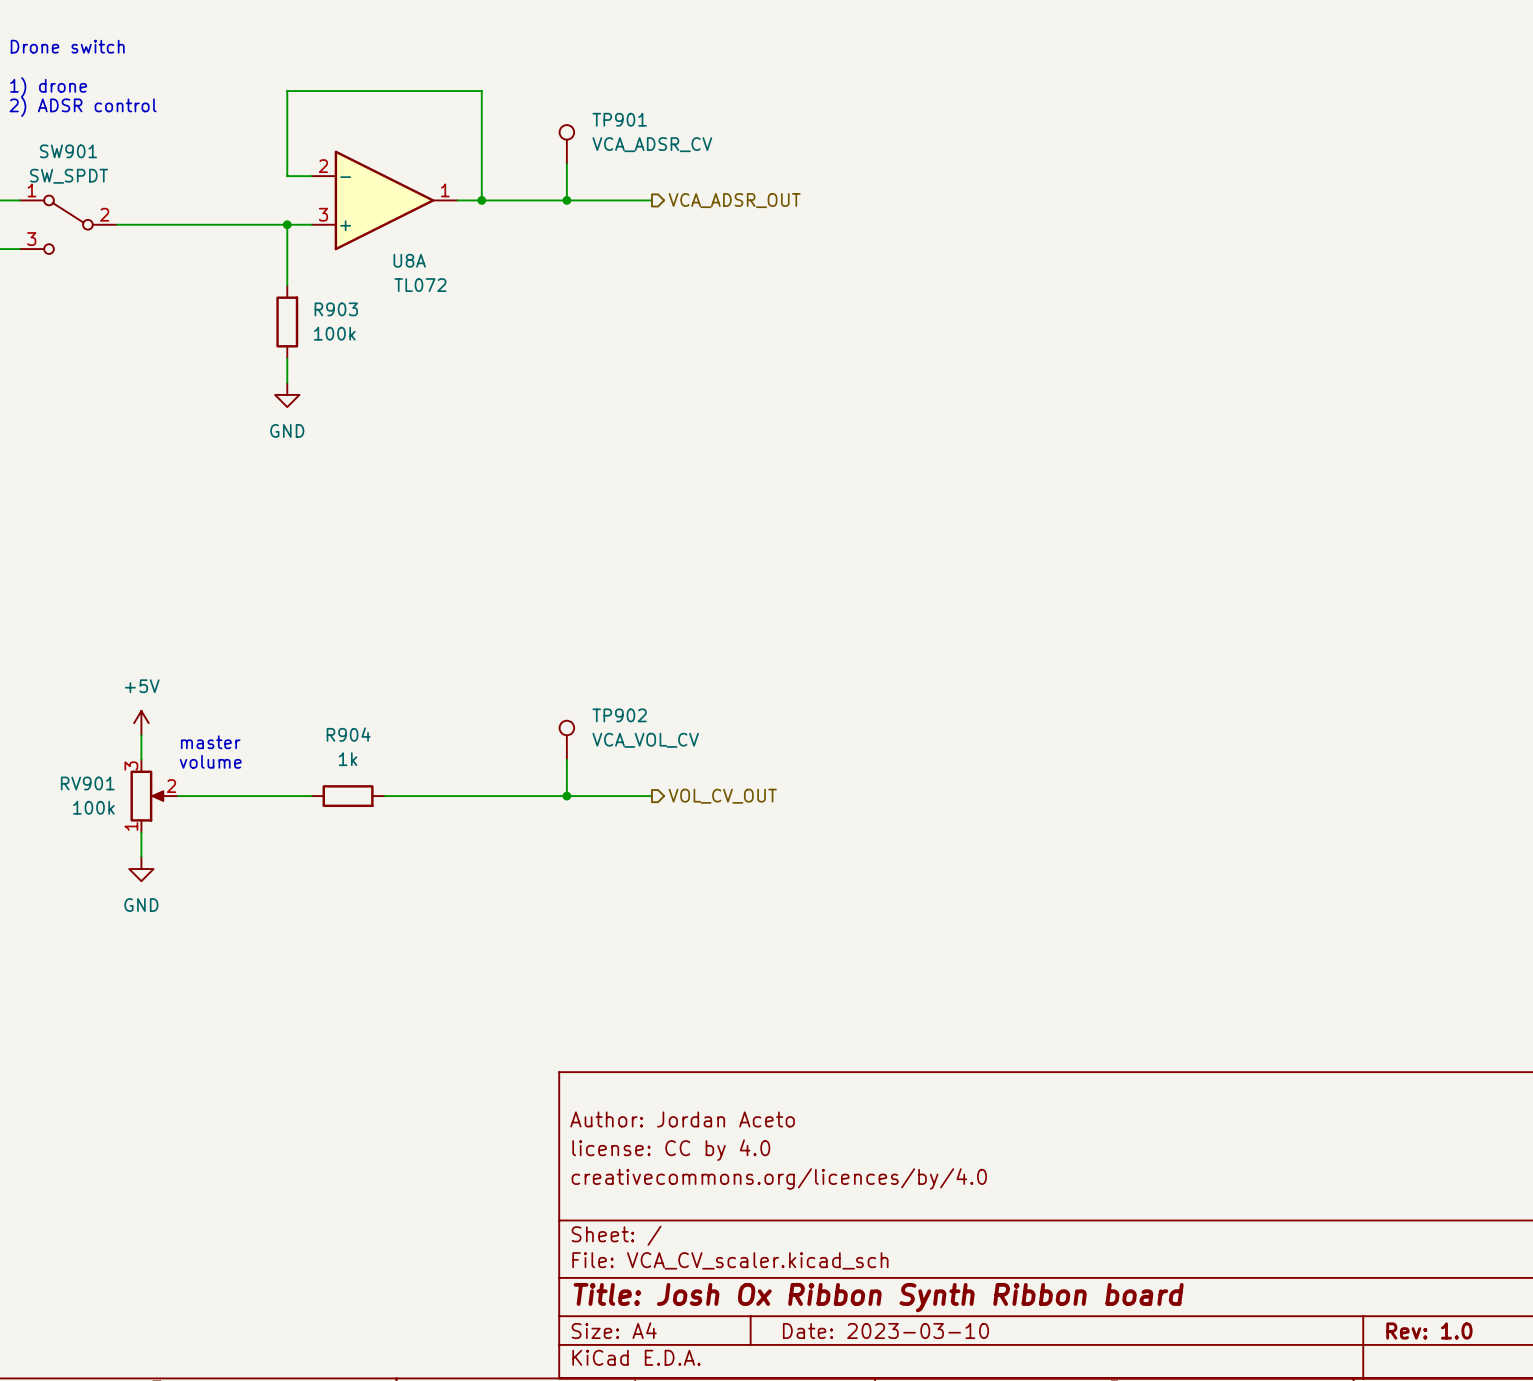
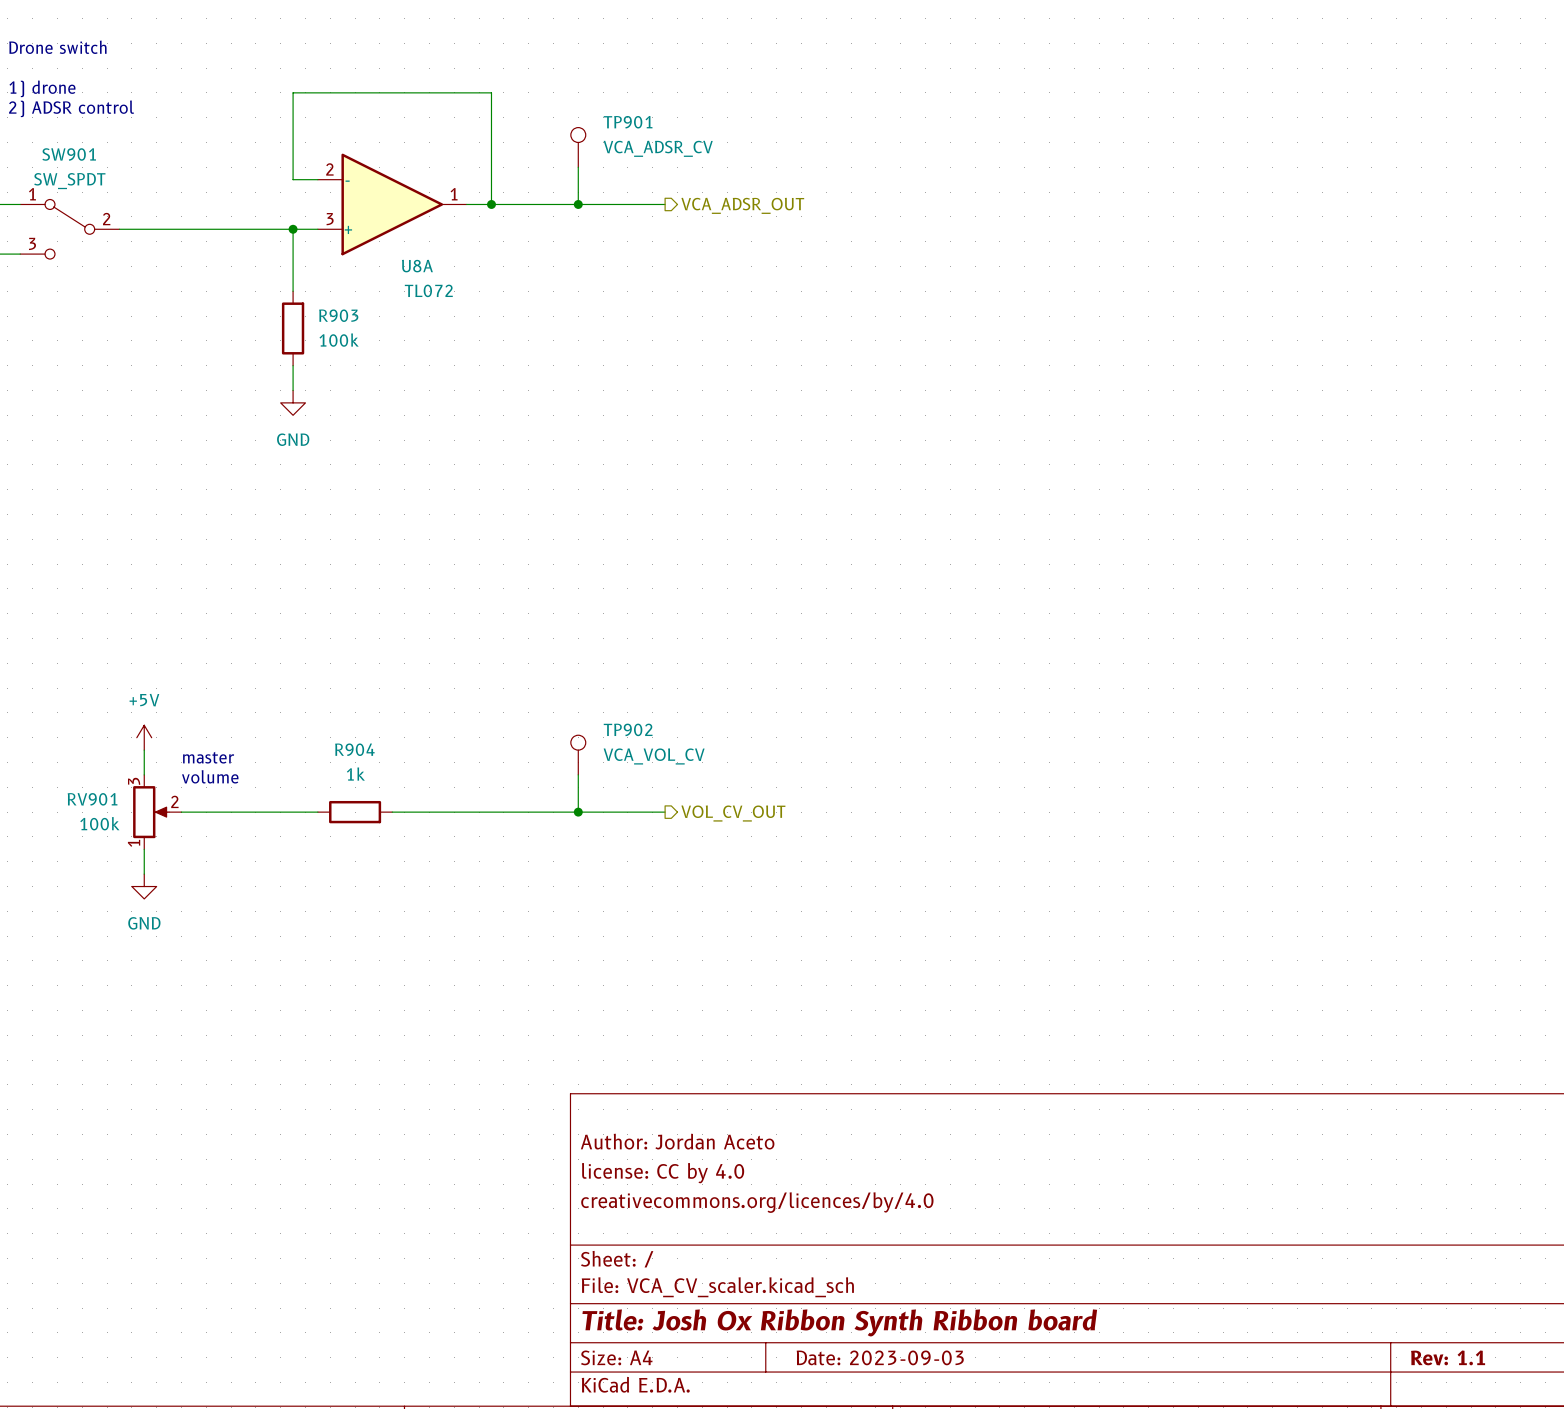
title block: Date: 2023-03-10 (885, 1330) -> Date: 2023-09-03 (880, 1357)
title block: Rev: 1.0 (1429, 1330) -> Rev: 1.1 (1448, 1357)

